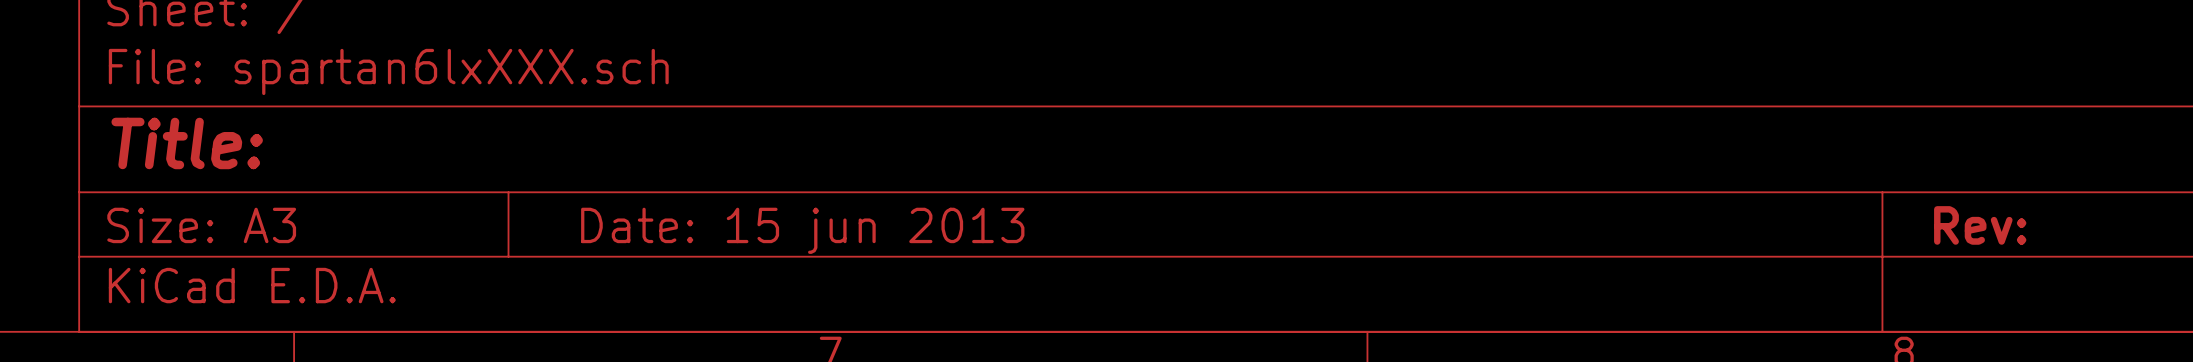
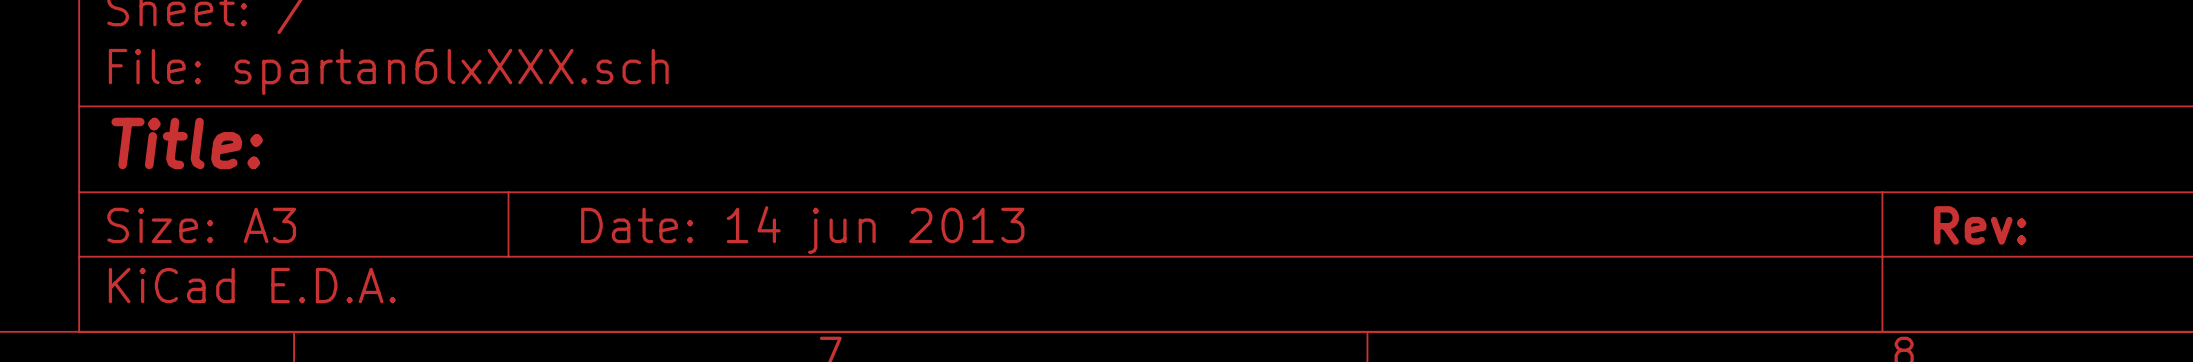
title block: Date: 15 jun 2013 (802, 230) -> Date: 14 jun 2013 (802, 230)

